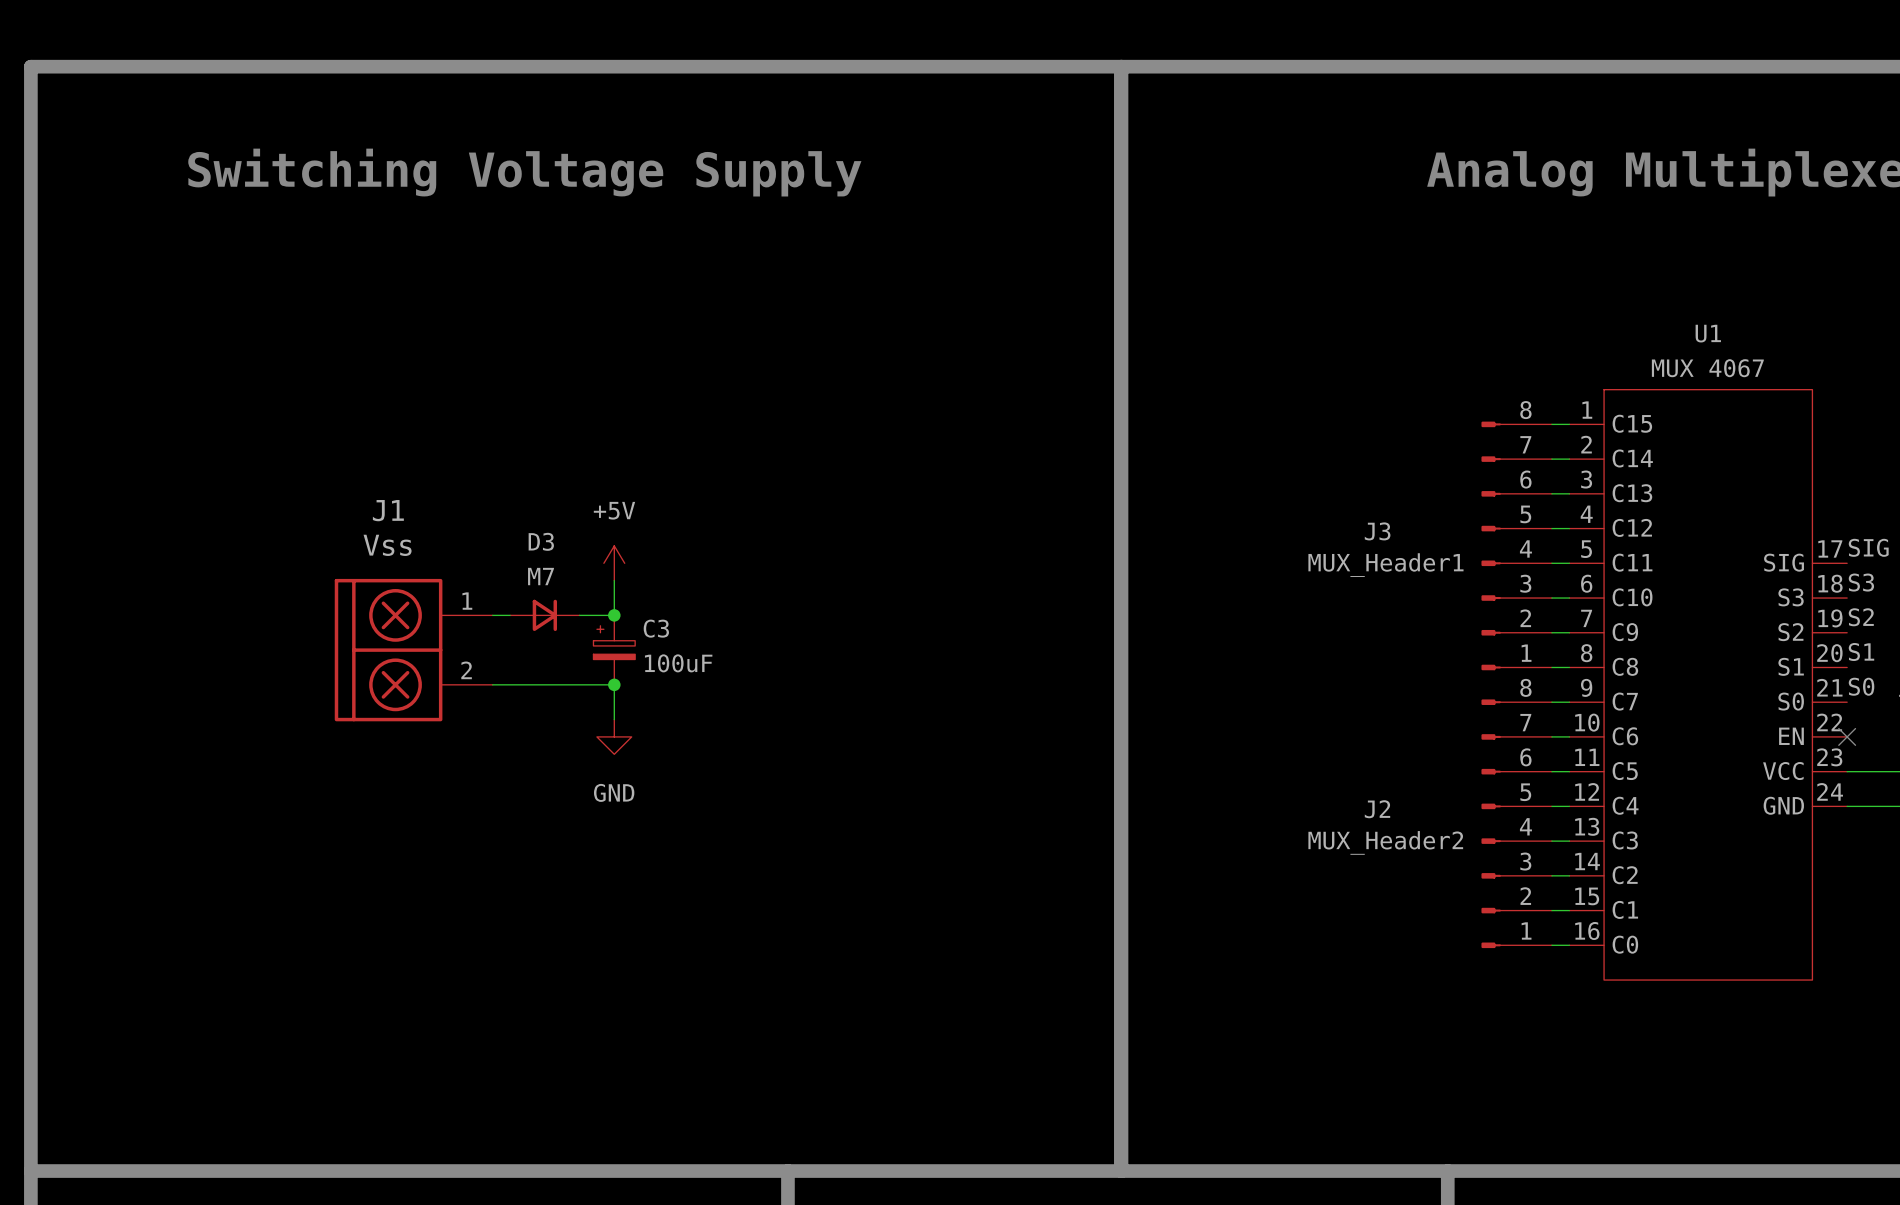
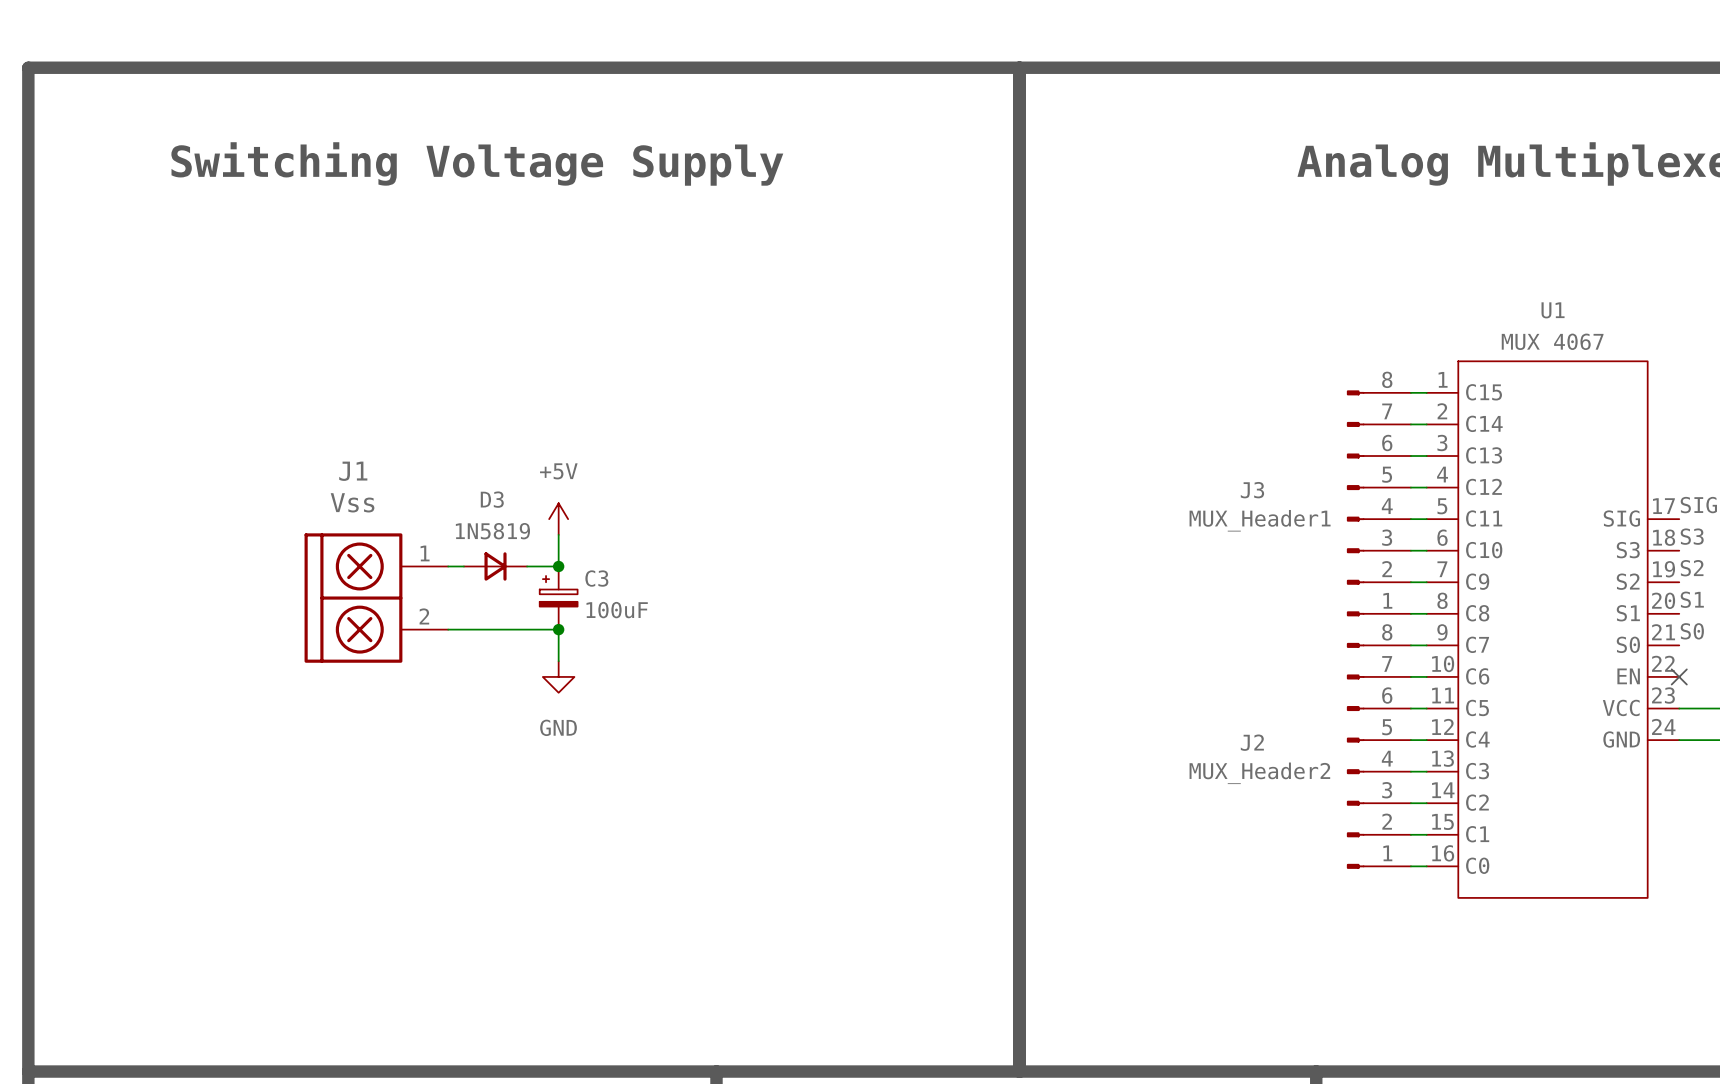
D3 value: M7 (540, 576) -> 1N5819 (492, 531)

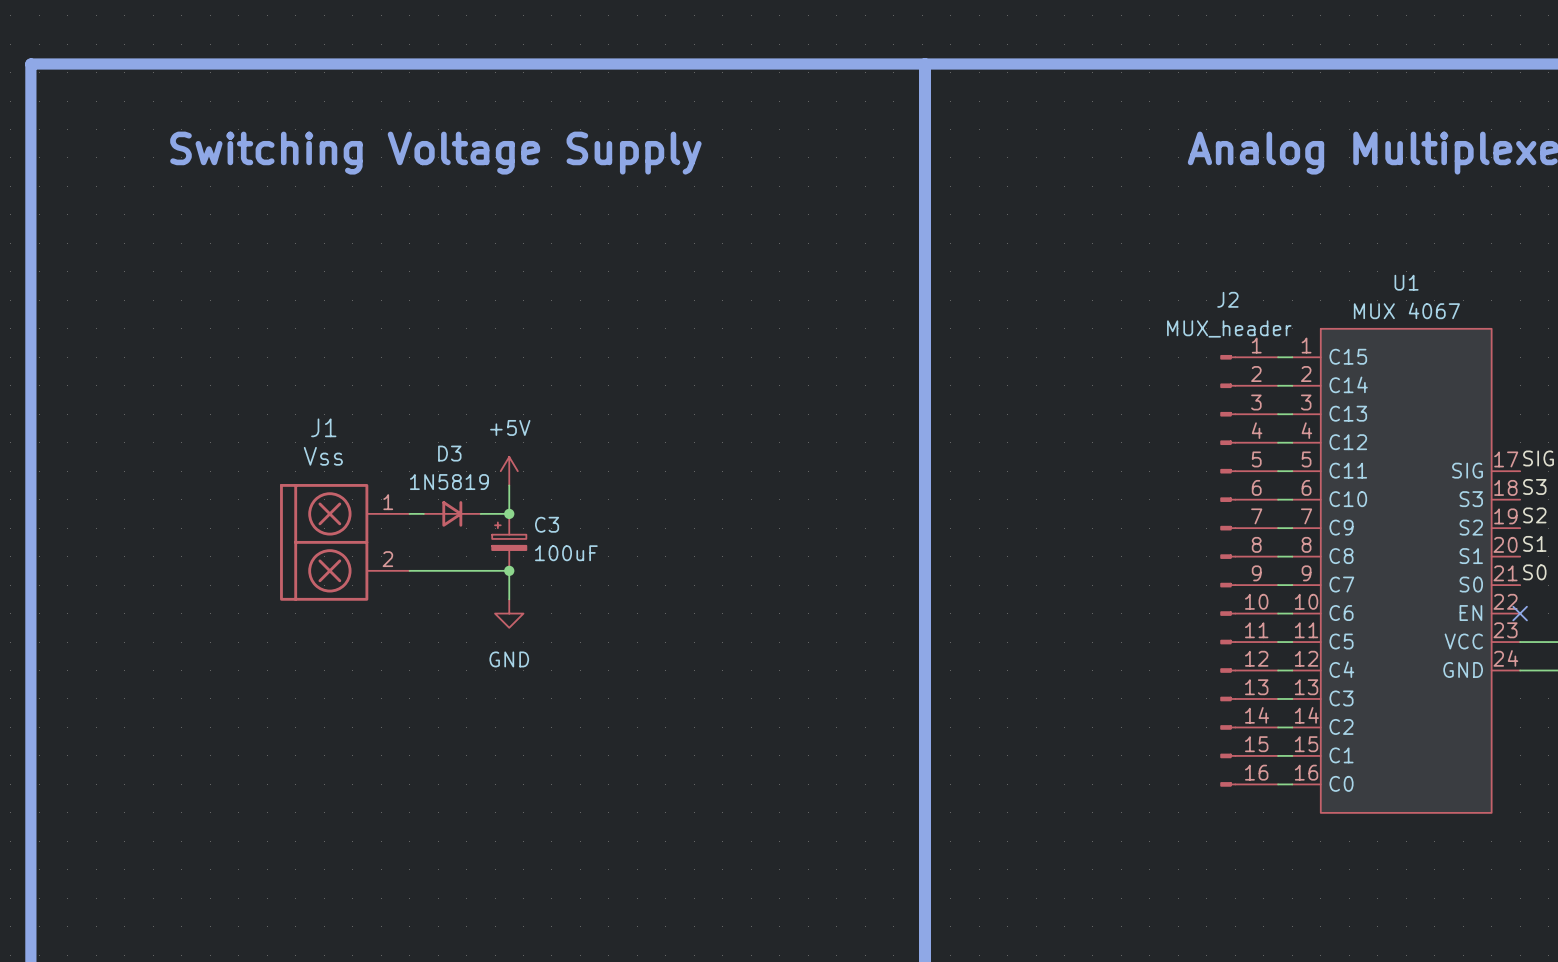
J3: MUX_Header1 (1378, 503) -> none
J2 symbol: [1346, 642, 1411, 869] -> [1220, 355, 1279, 787]
J2 name position: J2 (1252, 742) -> J2 (1227, 299)
J2 value: MUX_Header2 (1259, 773) -> MUX_header (1229, 328)

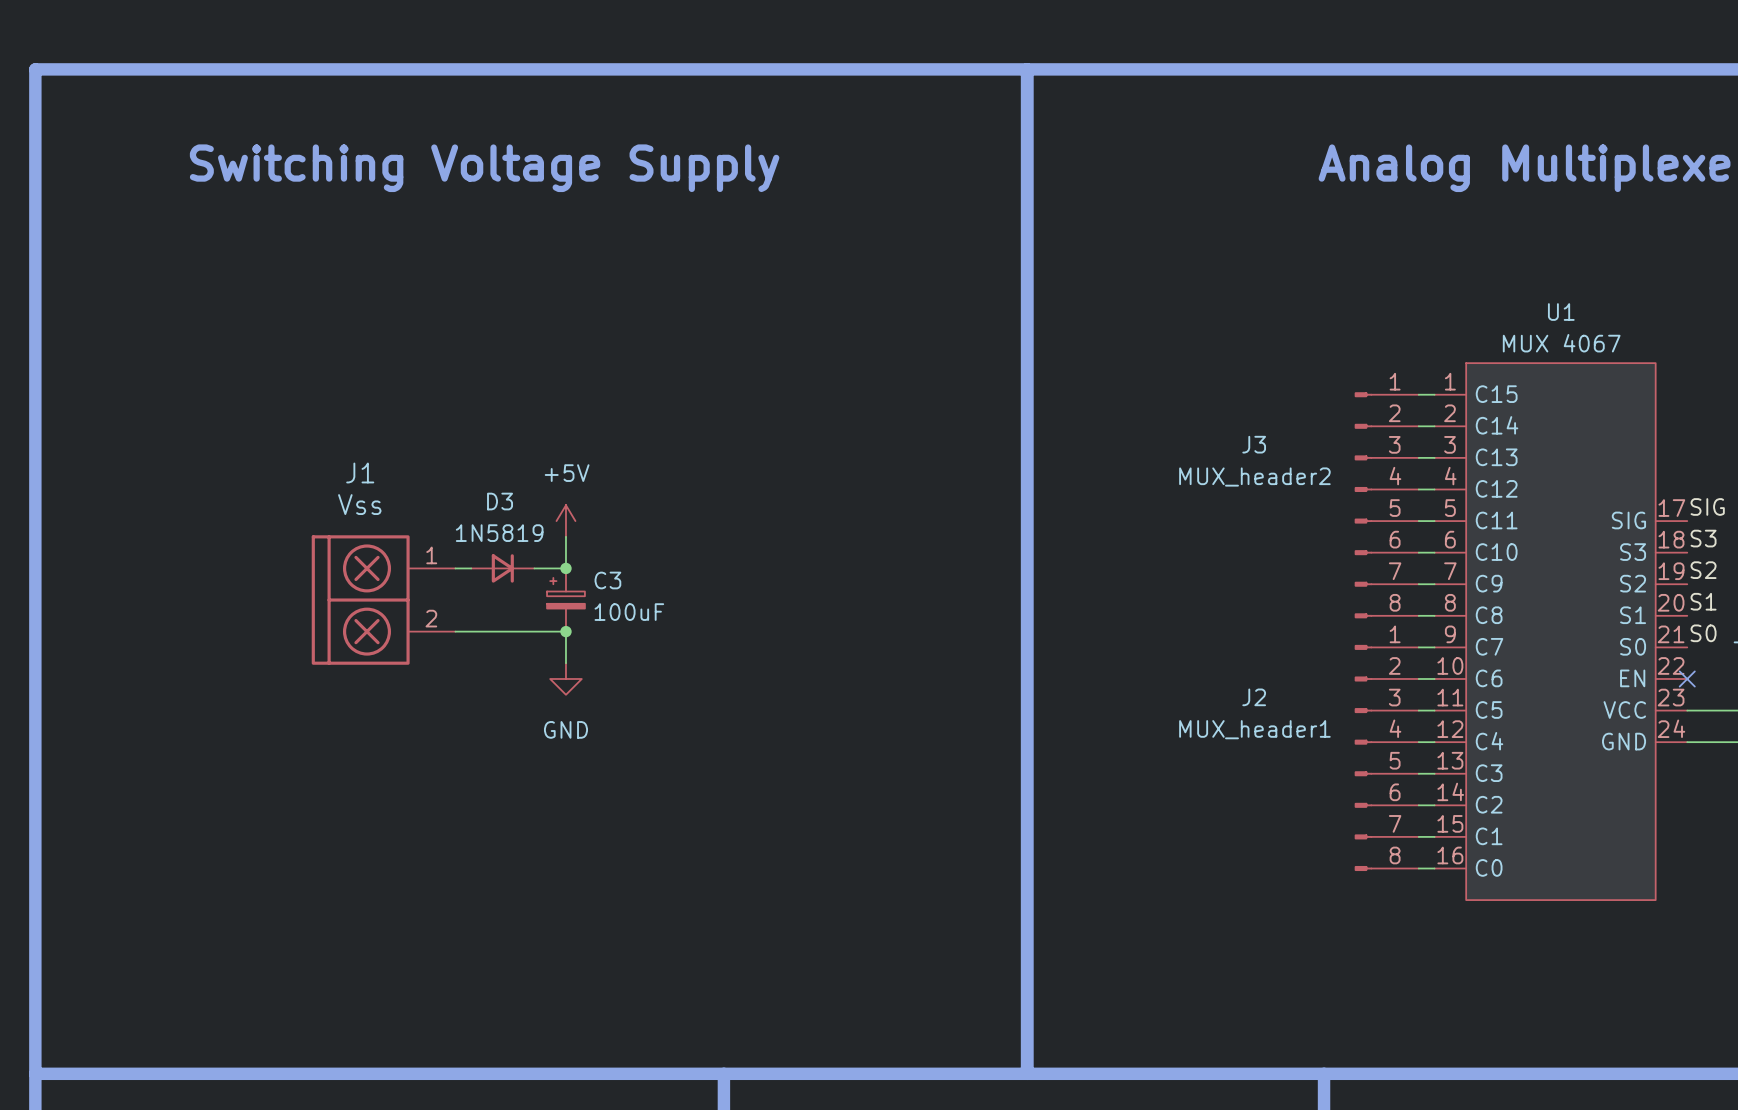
J2 name position: J2 (1227, 299) -> J2 (1254, 697)
J2 value: MUX_header (1229, 328) -> MUX_header1 (1254, 729)
J2 symbol: [1220, 355, 1279, 787] -> [1354, 644, 1419, 872]
J3: none -> MUX_header2 (1386, 505)

